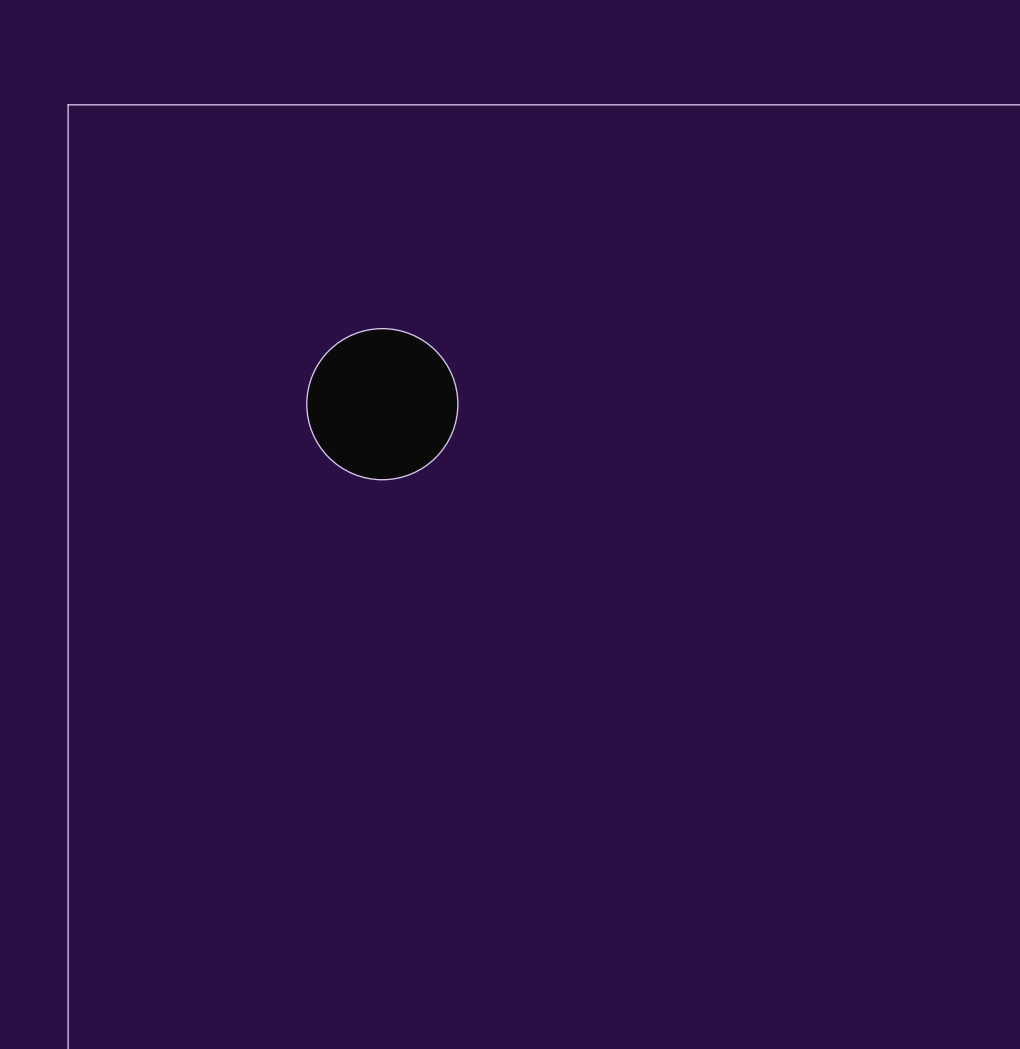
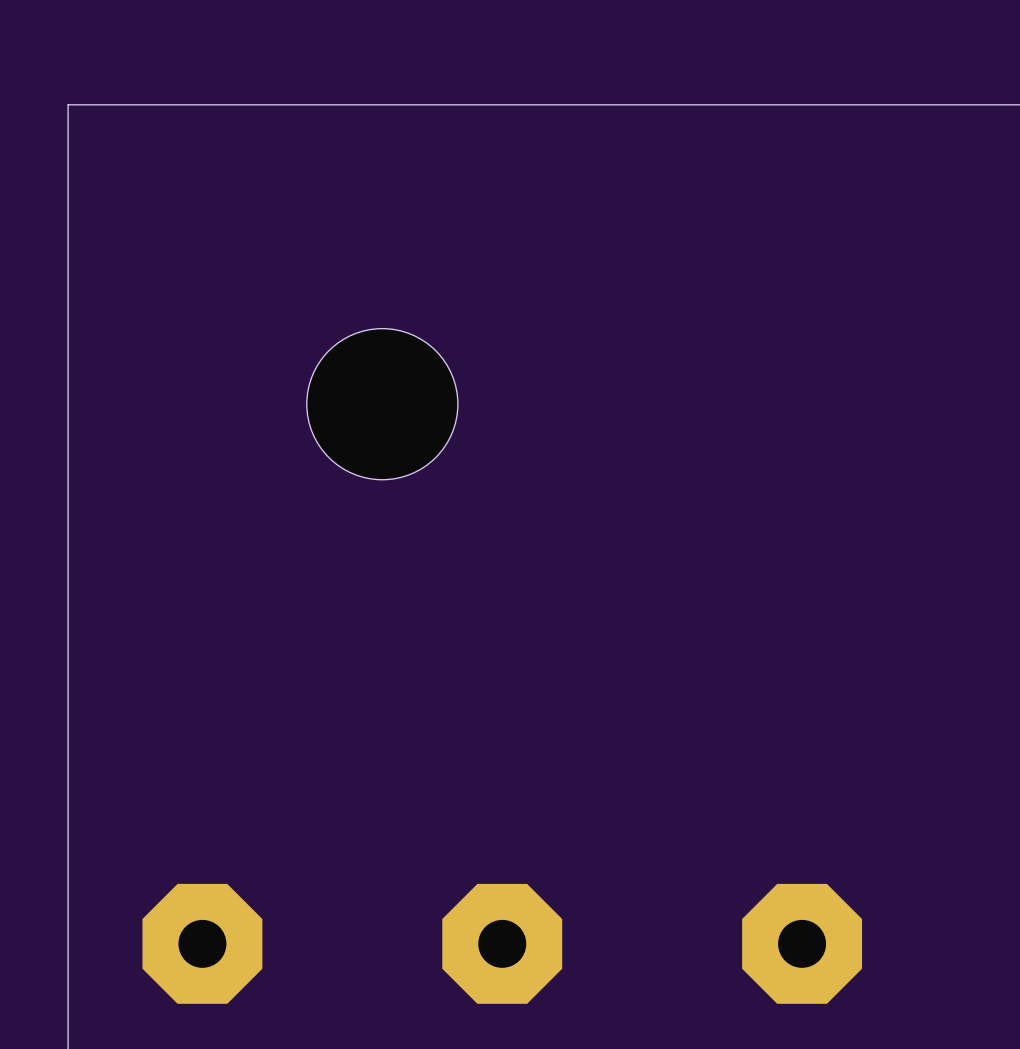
part: none -> (202, 943)
part: none -> (502, 943)
part: none -> (802, 943)

